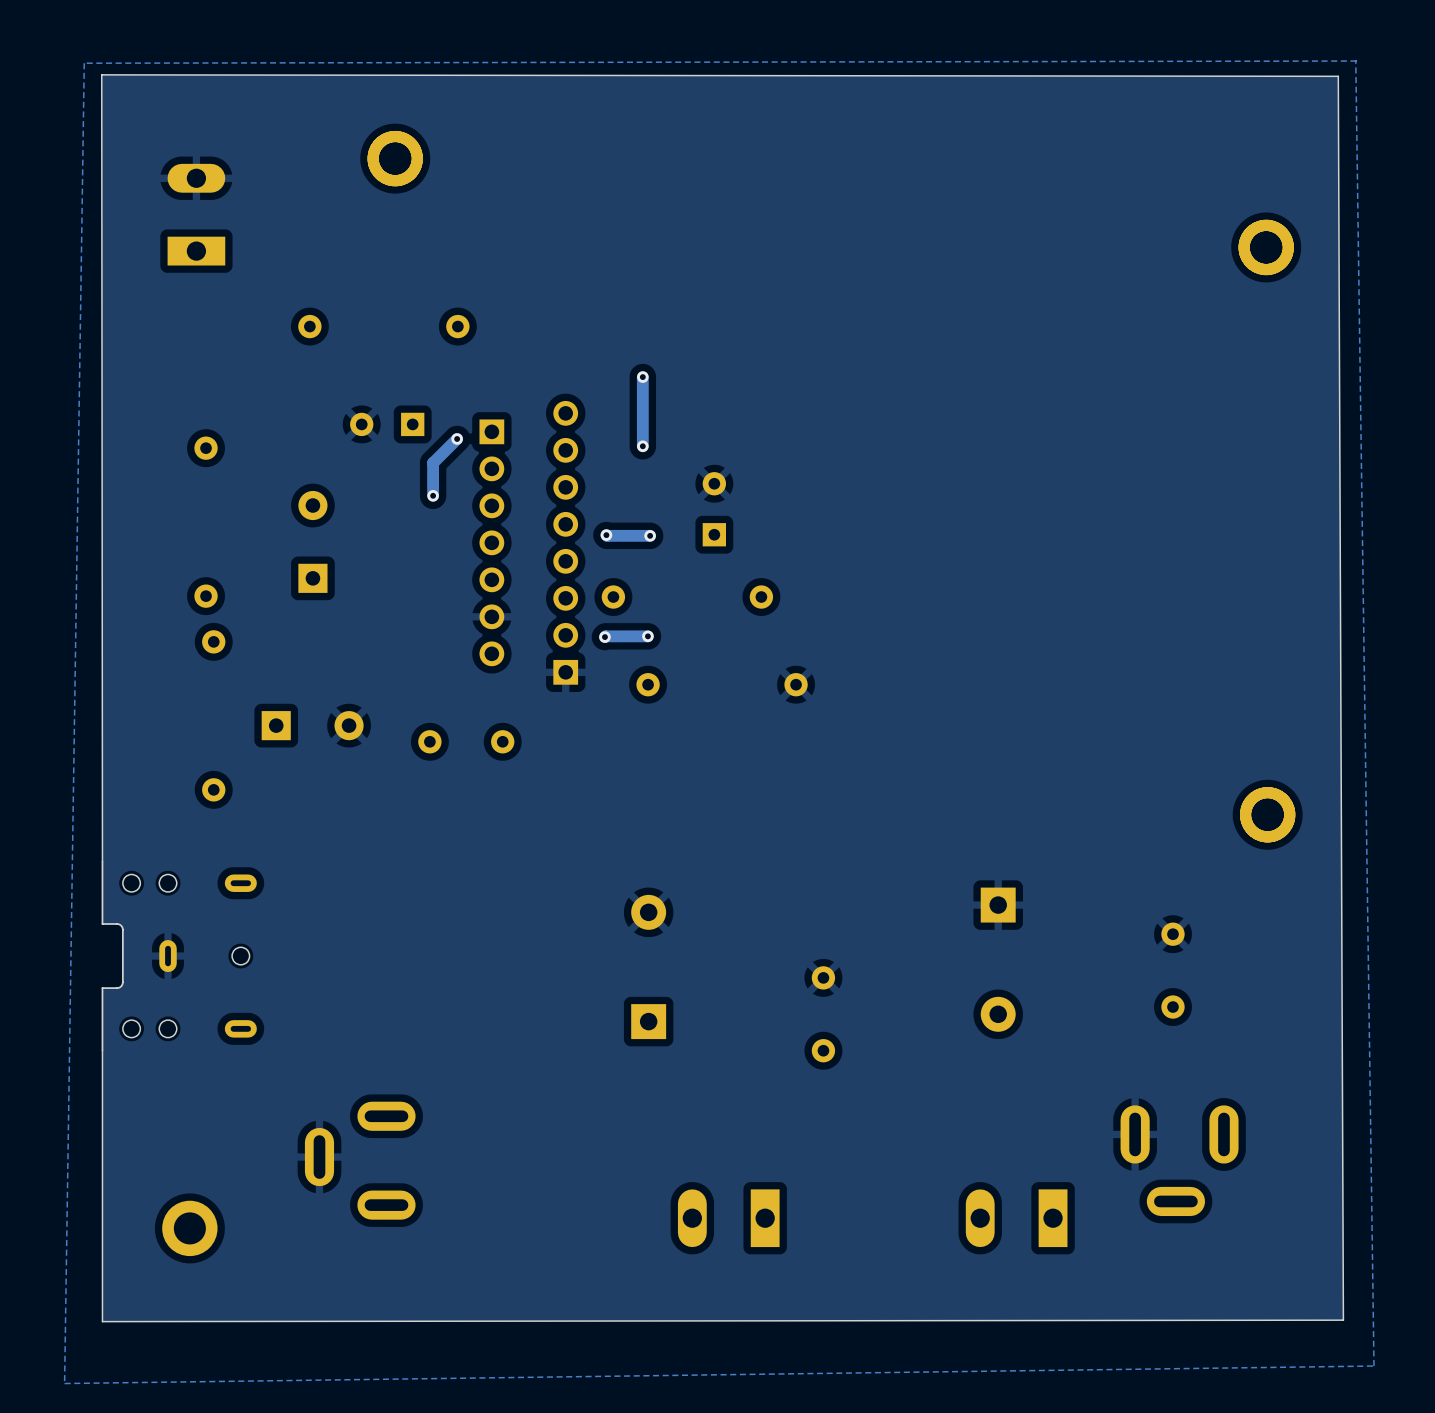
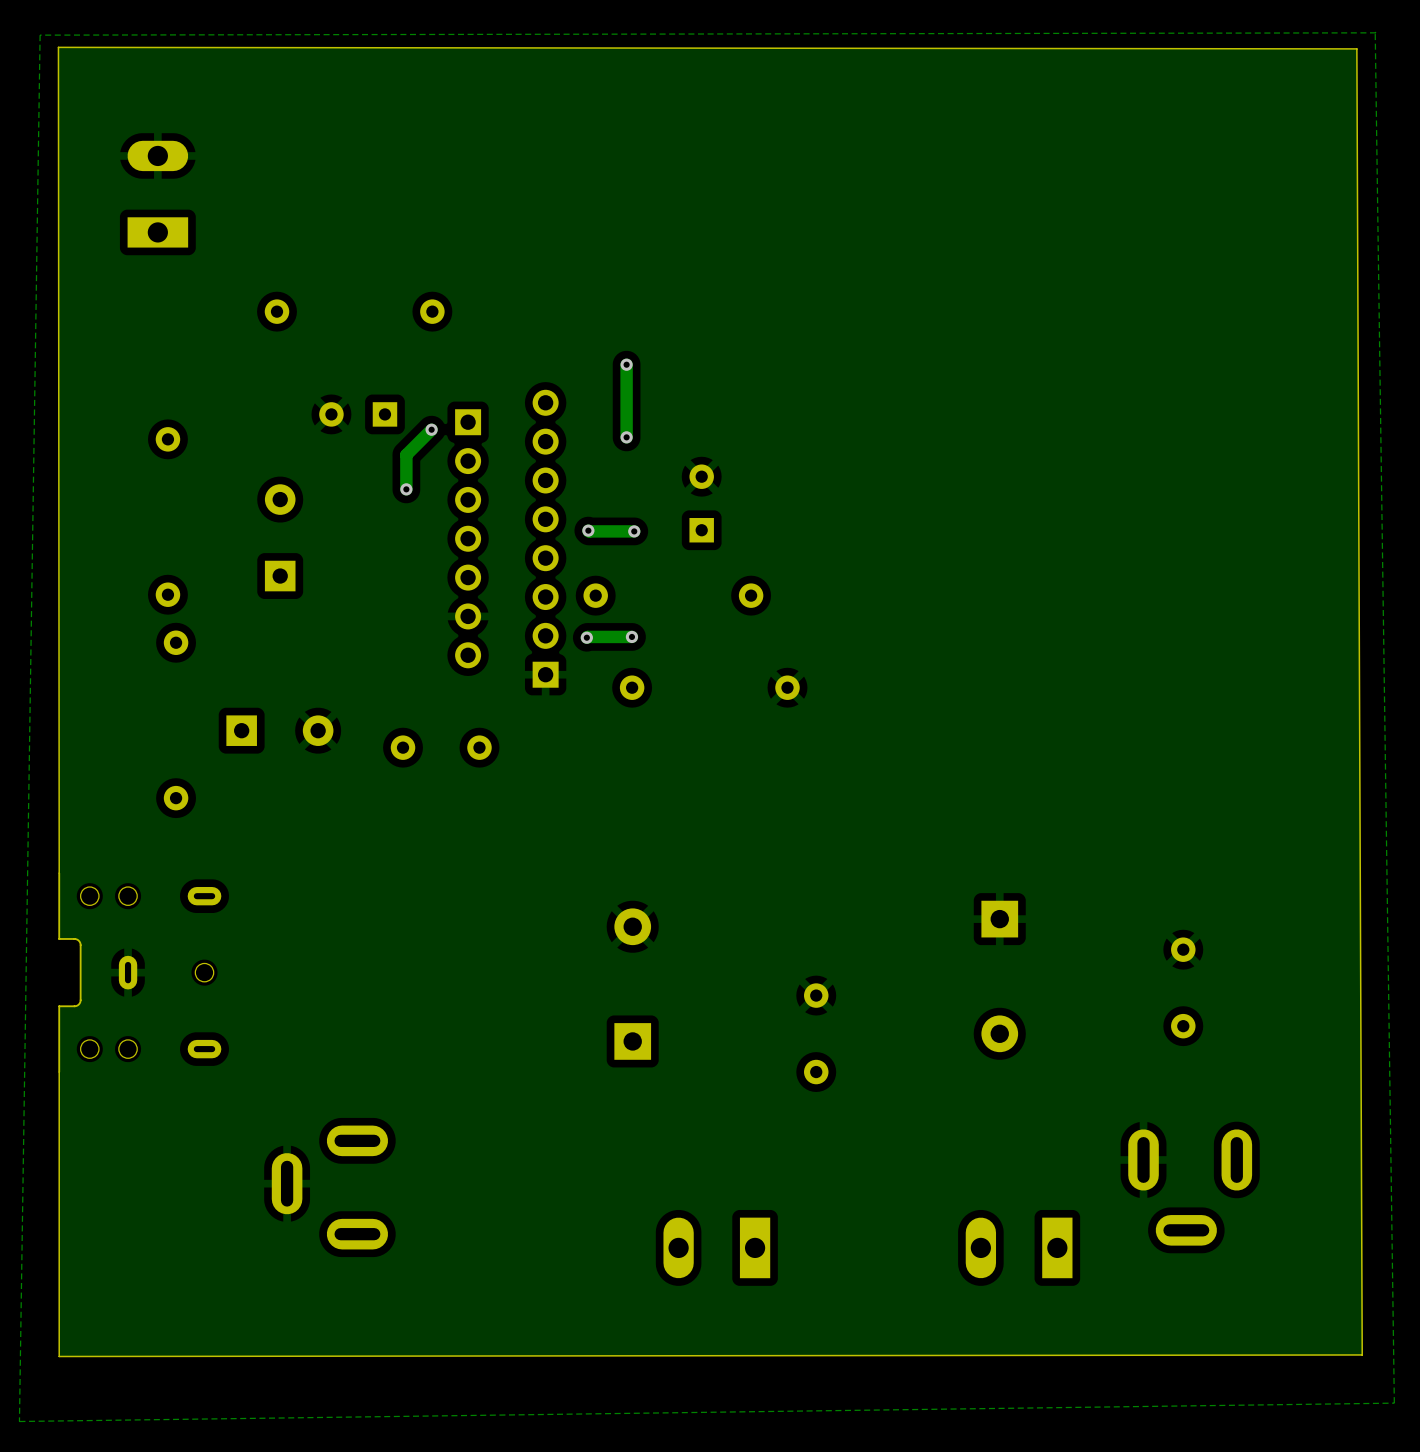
part: (395, 158) -> none
part: (1266, 247) -> none
part: (1267, 814) -> none
part: (189, 1228) -> none

